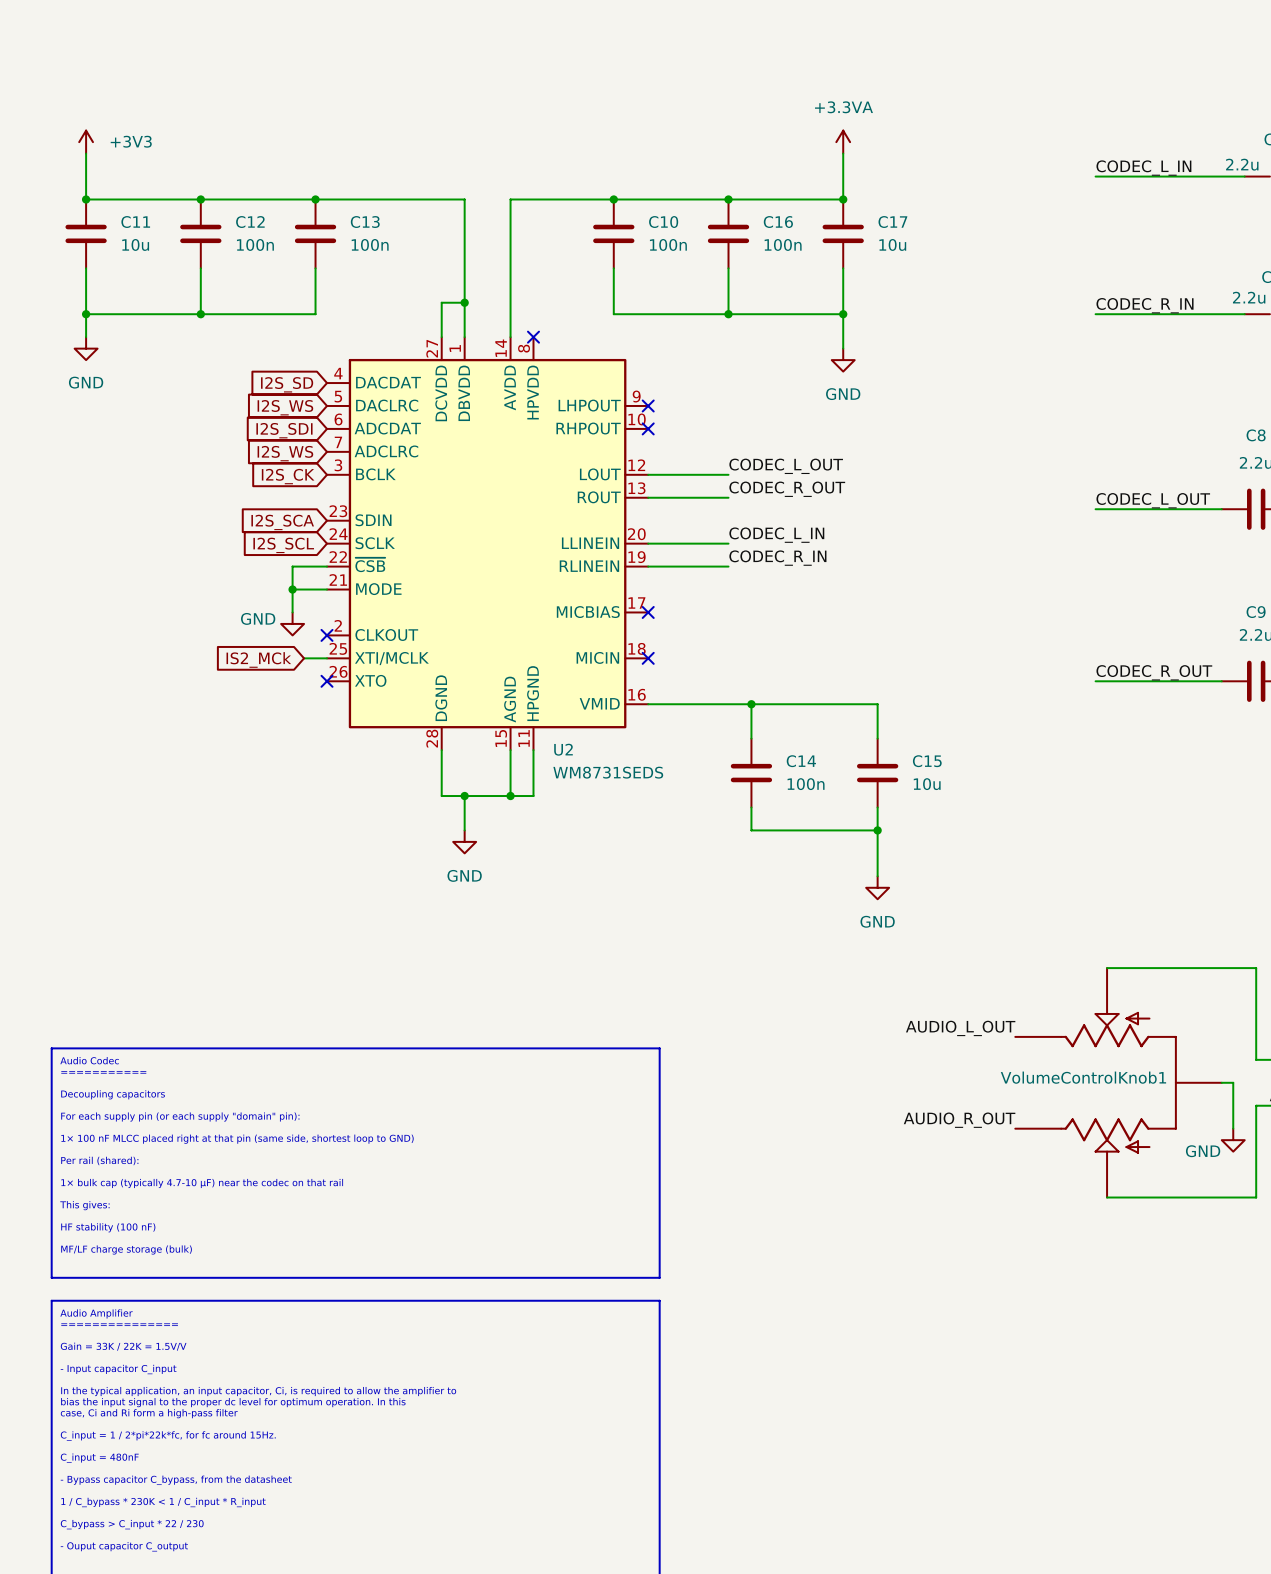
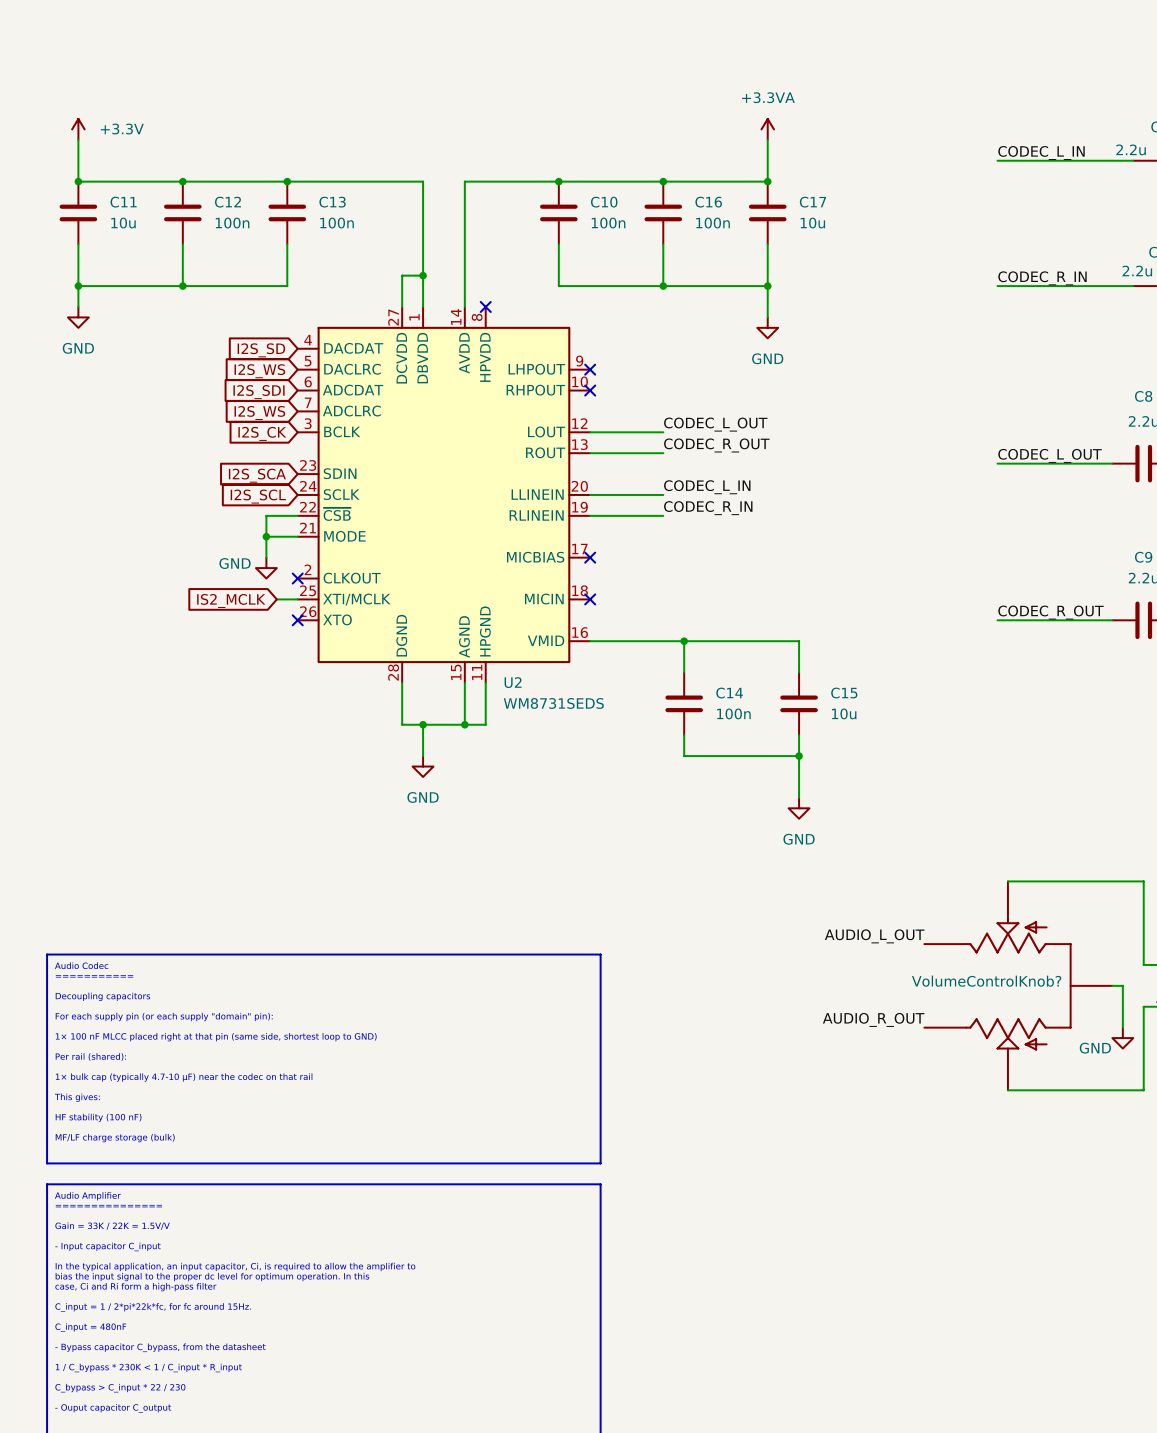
power symbol: +3V3 (86, 142) -> +3.3V (78, 129)
global label: IS2_MCk (258, 659) -> IS2_MCLK (231, 601)
VolumeControlKnob1 name: VolumeControlKnob1 (1083, 1077) -> VolumeControlKnob? (986, 981)

